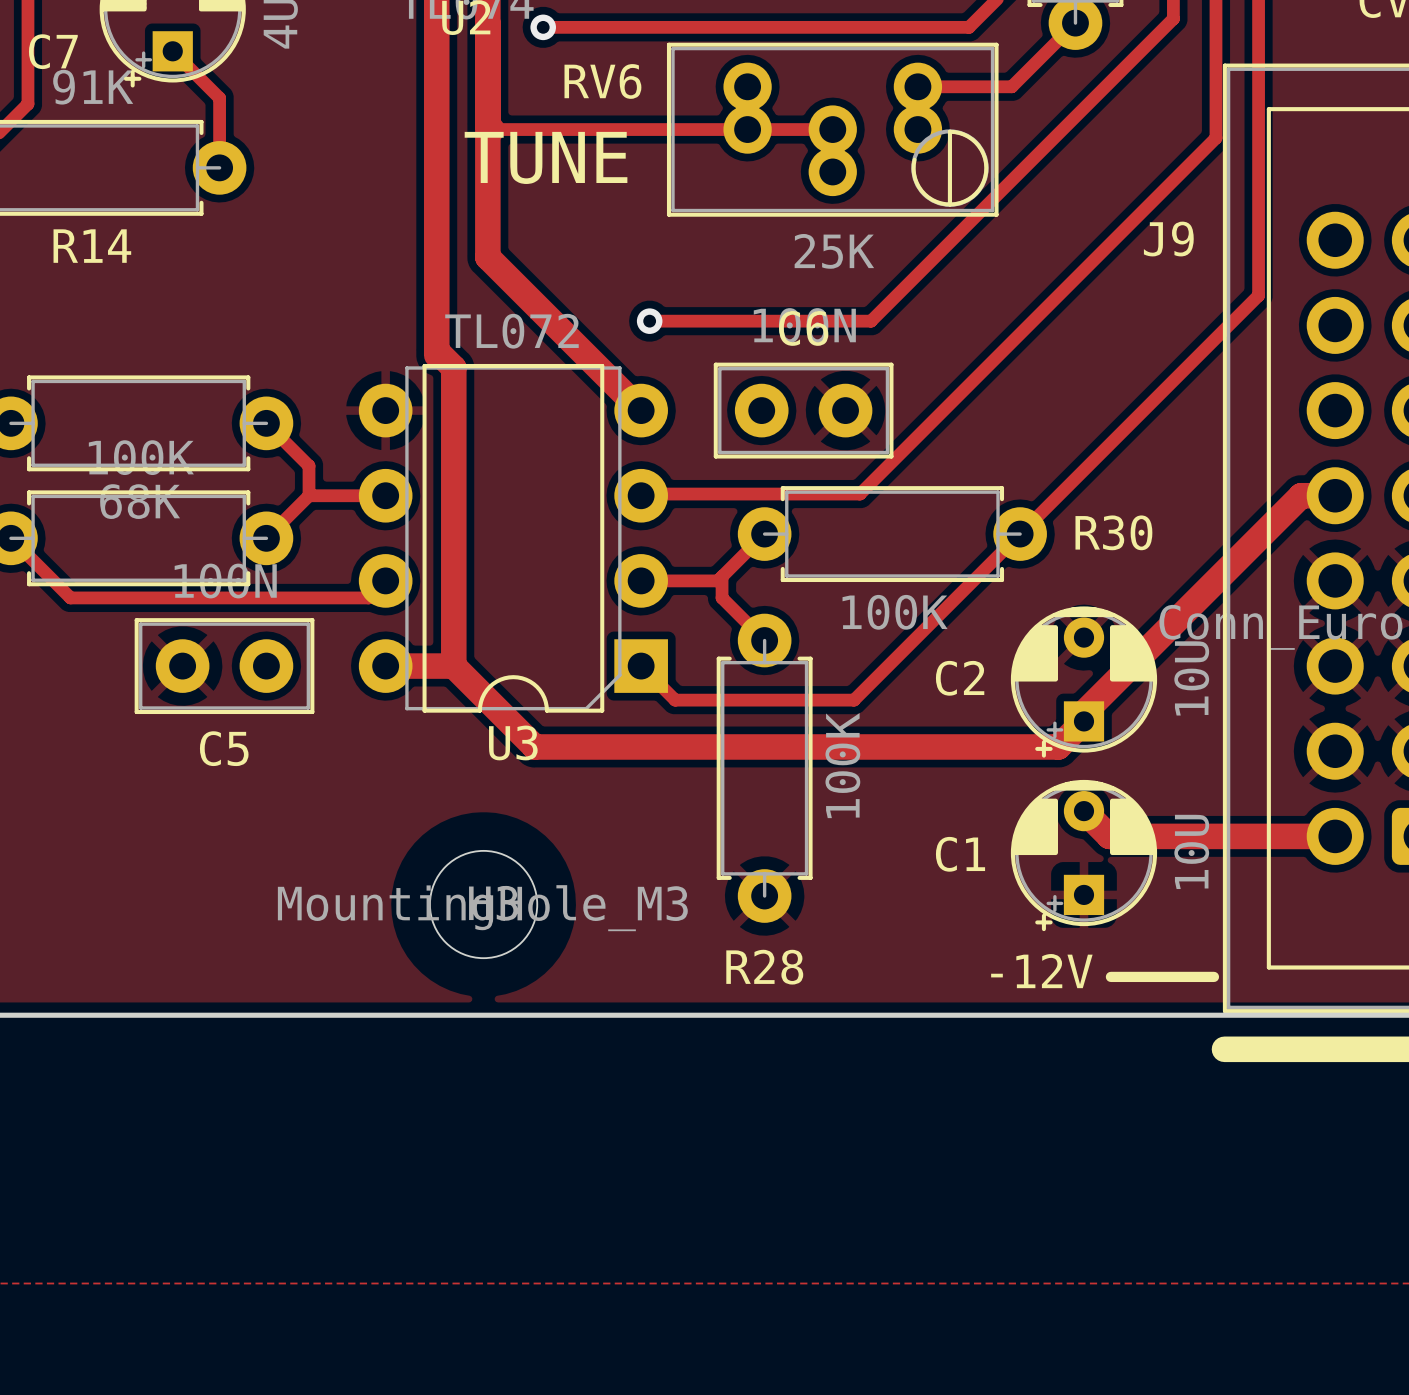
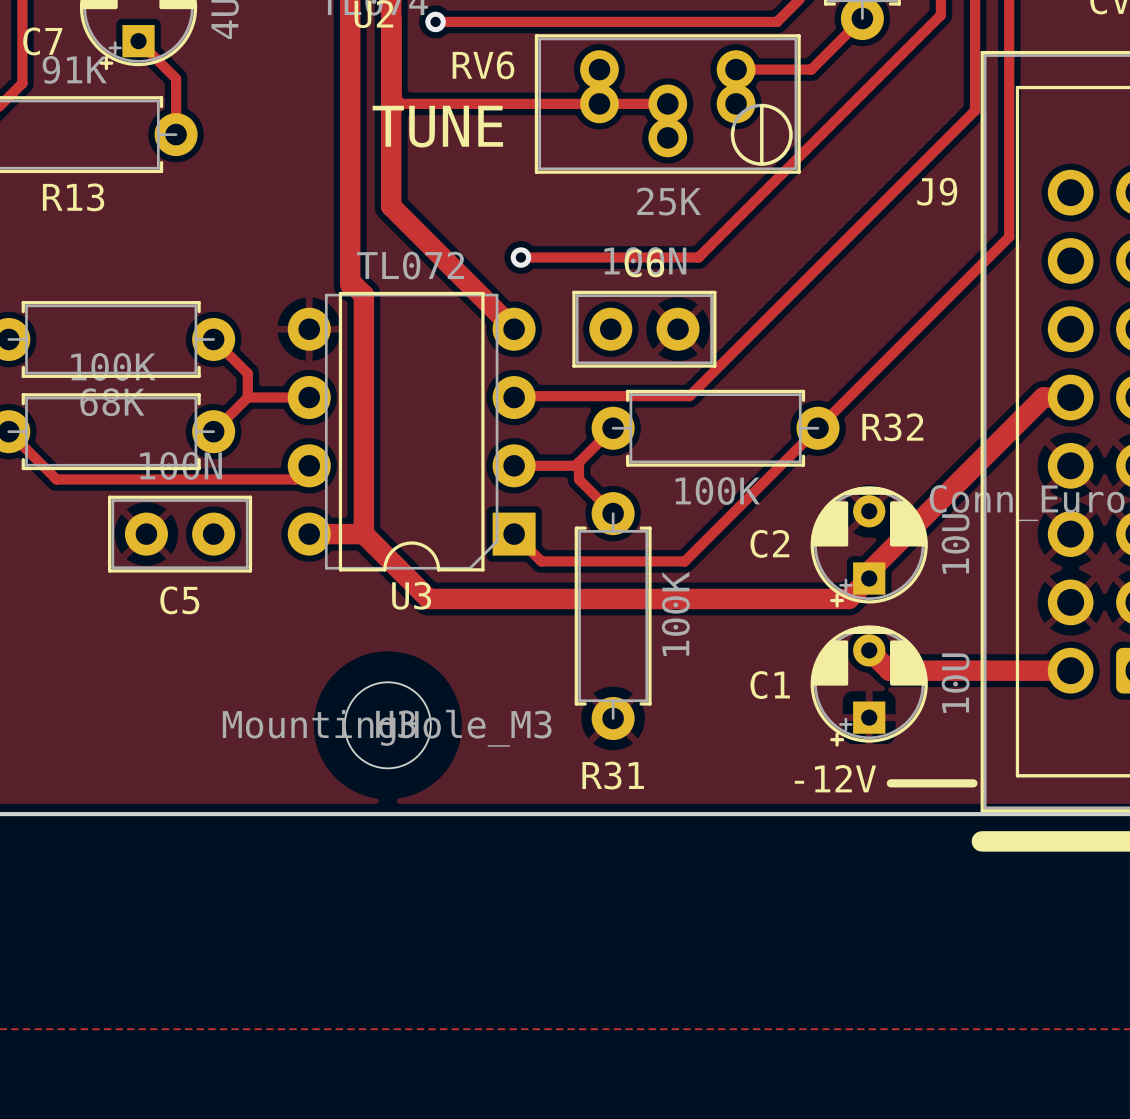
R14 name: R14 (92, 246) -> R13 (73, 197)
R30 name: R30 (1113, 532) -> R32 (892, 427)
R28 name: R28 (764, 967) -> R31 (613, 775)

